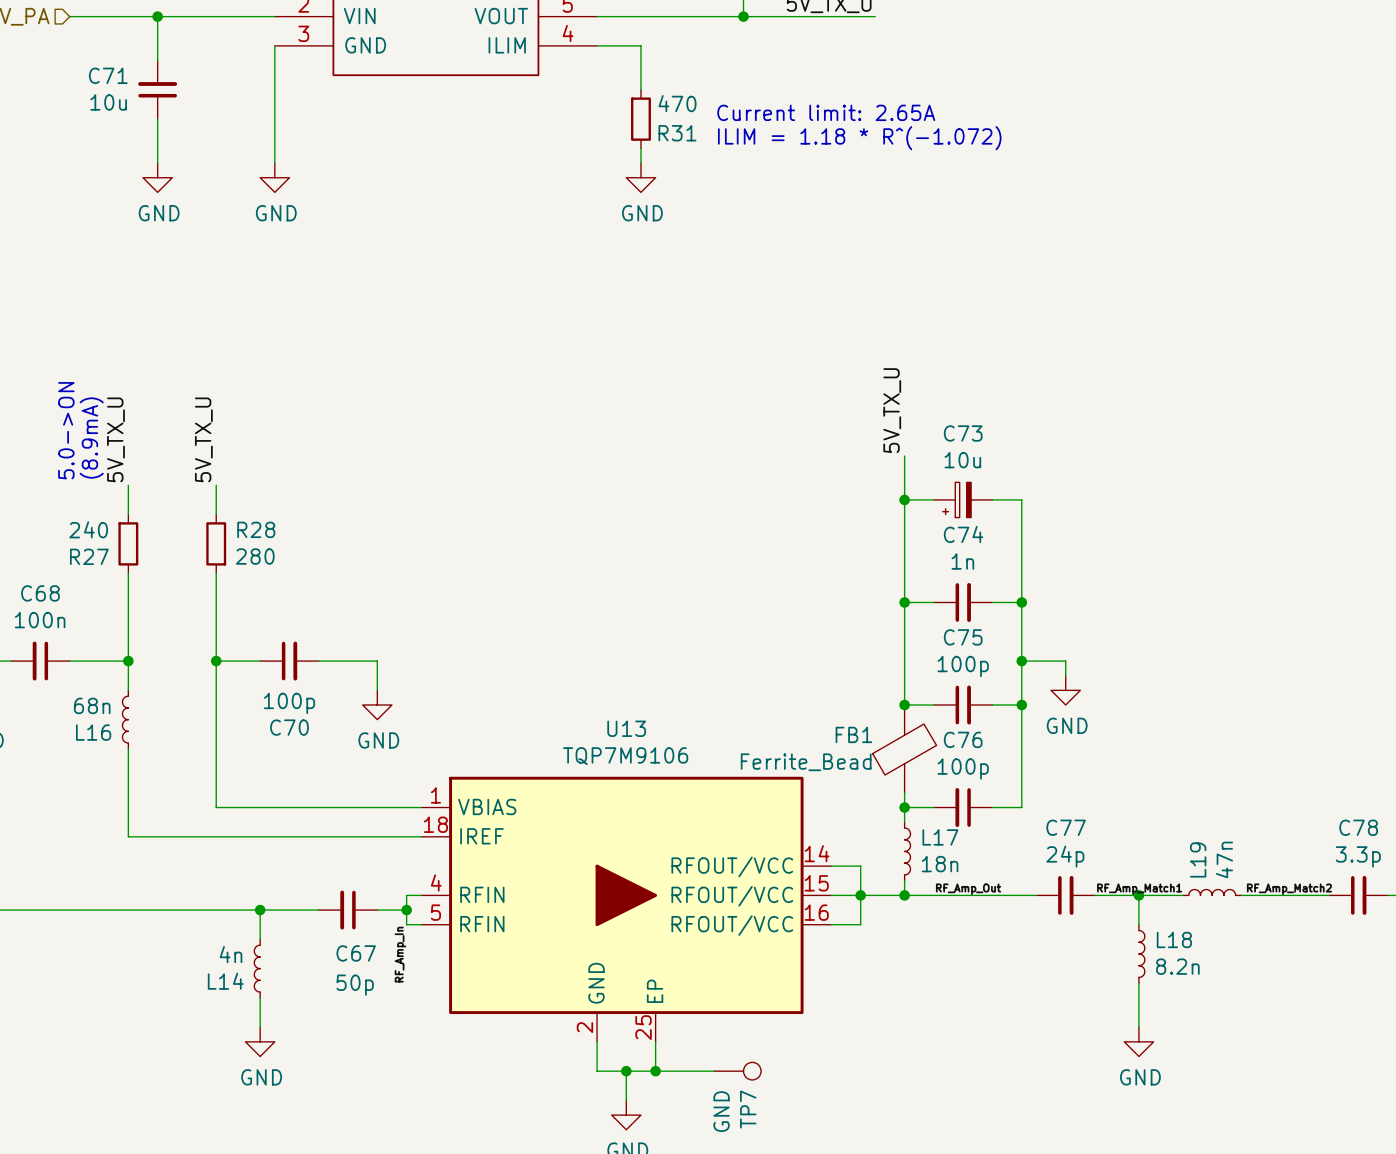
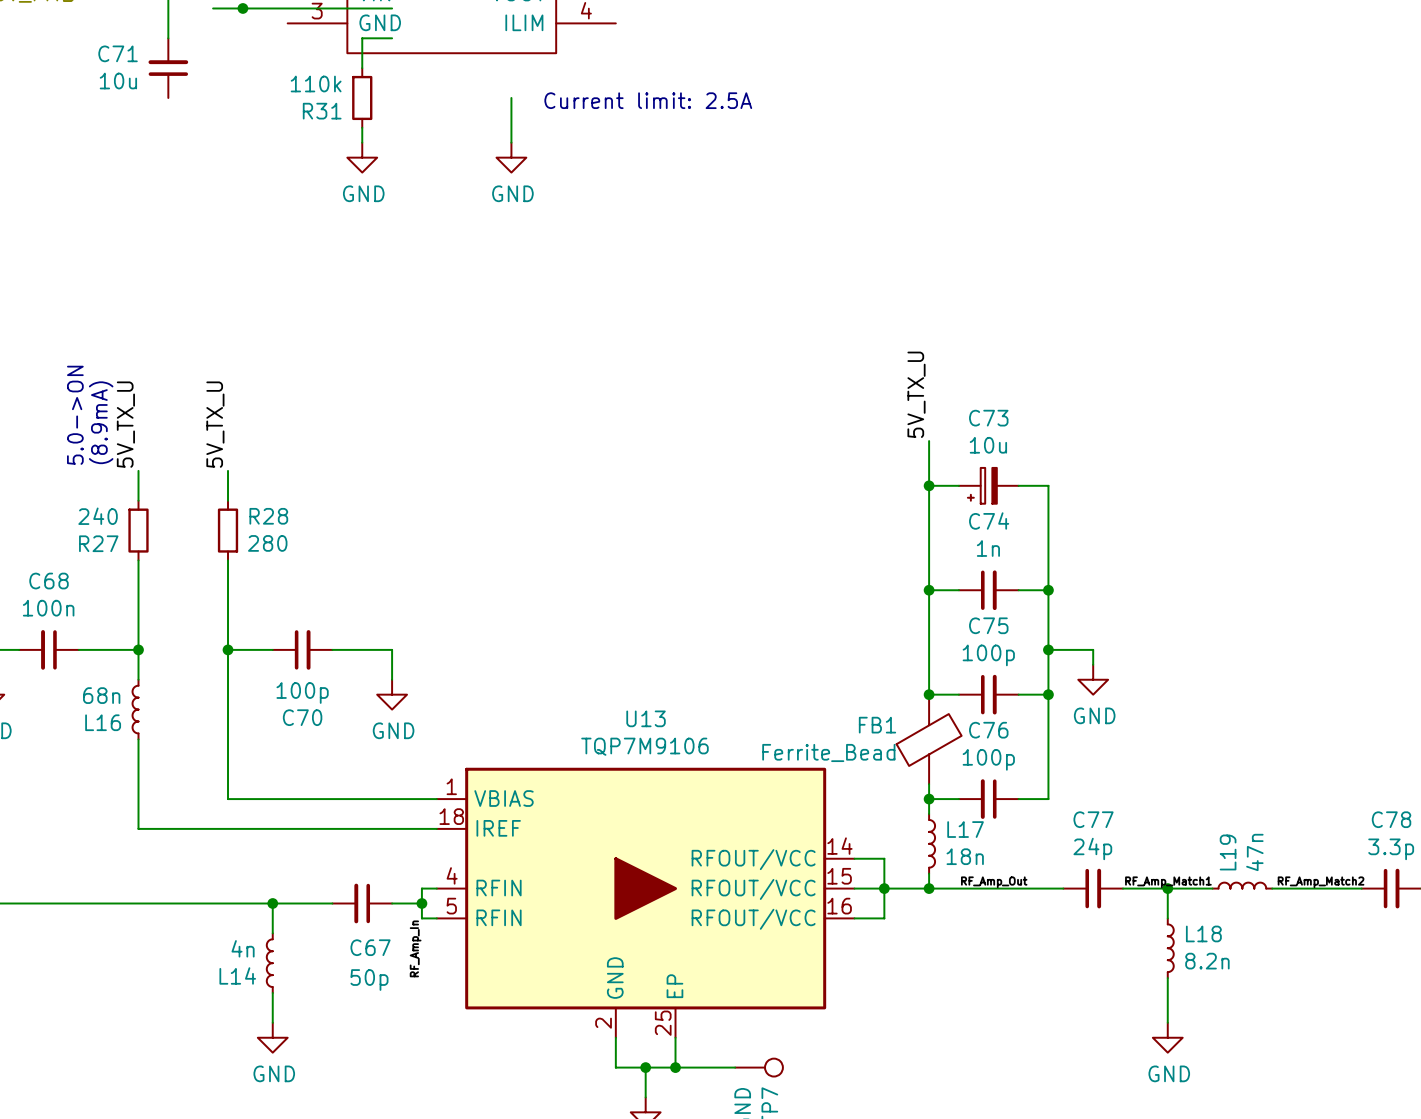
wire: none -> (213, 8) (392, 8)
junction: none -> (242, 8)
wire: (274, 45) (274, 163) -> none
wire: (597, 45) (640, 45) (640, 89) -> none
wire: none -> (392, 38) (362, 38) (362, 68)
R31 value: 470 (677, 103) -> 110k (316, 83)
text: Current limit: 2.65A (826, 112) -> Current limit: 2.5A (648, 100)
wire: (157, 119) (157, 163) -> none
wire: none -> (511, 97) (511, 142)
R31 position: (640, 119) -> (362, 97)
R31 name position: R31 (677, 133) -> R31 (322, 111)
text: ILIM = 1.18 * R^(-1.072) (859, 138) -> none
wire: none -> (362, 127) (362, 142)
wire: (640, 148) (640, 163) -> none
power symbol: GND (157, 177) -> none
power symbol position: GND (274, 177) -> GND (362, 157)
power symbol: none -> GND (511, 157)
power symbol: GND (640, 177) -> none

